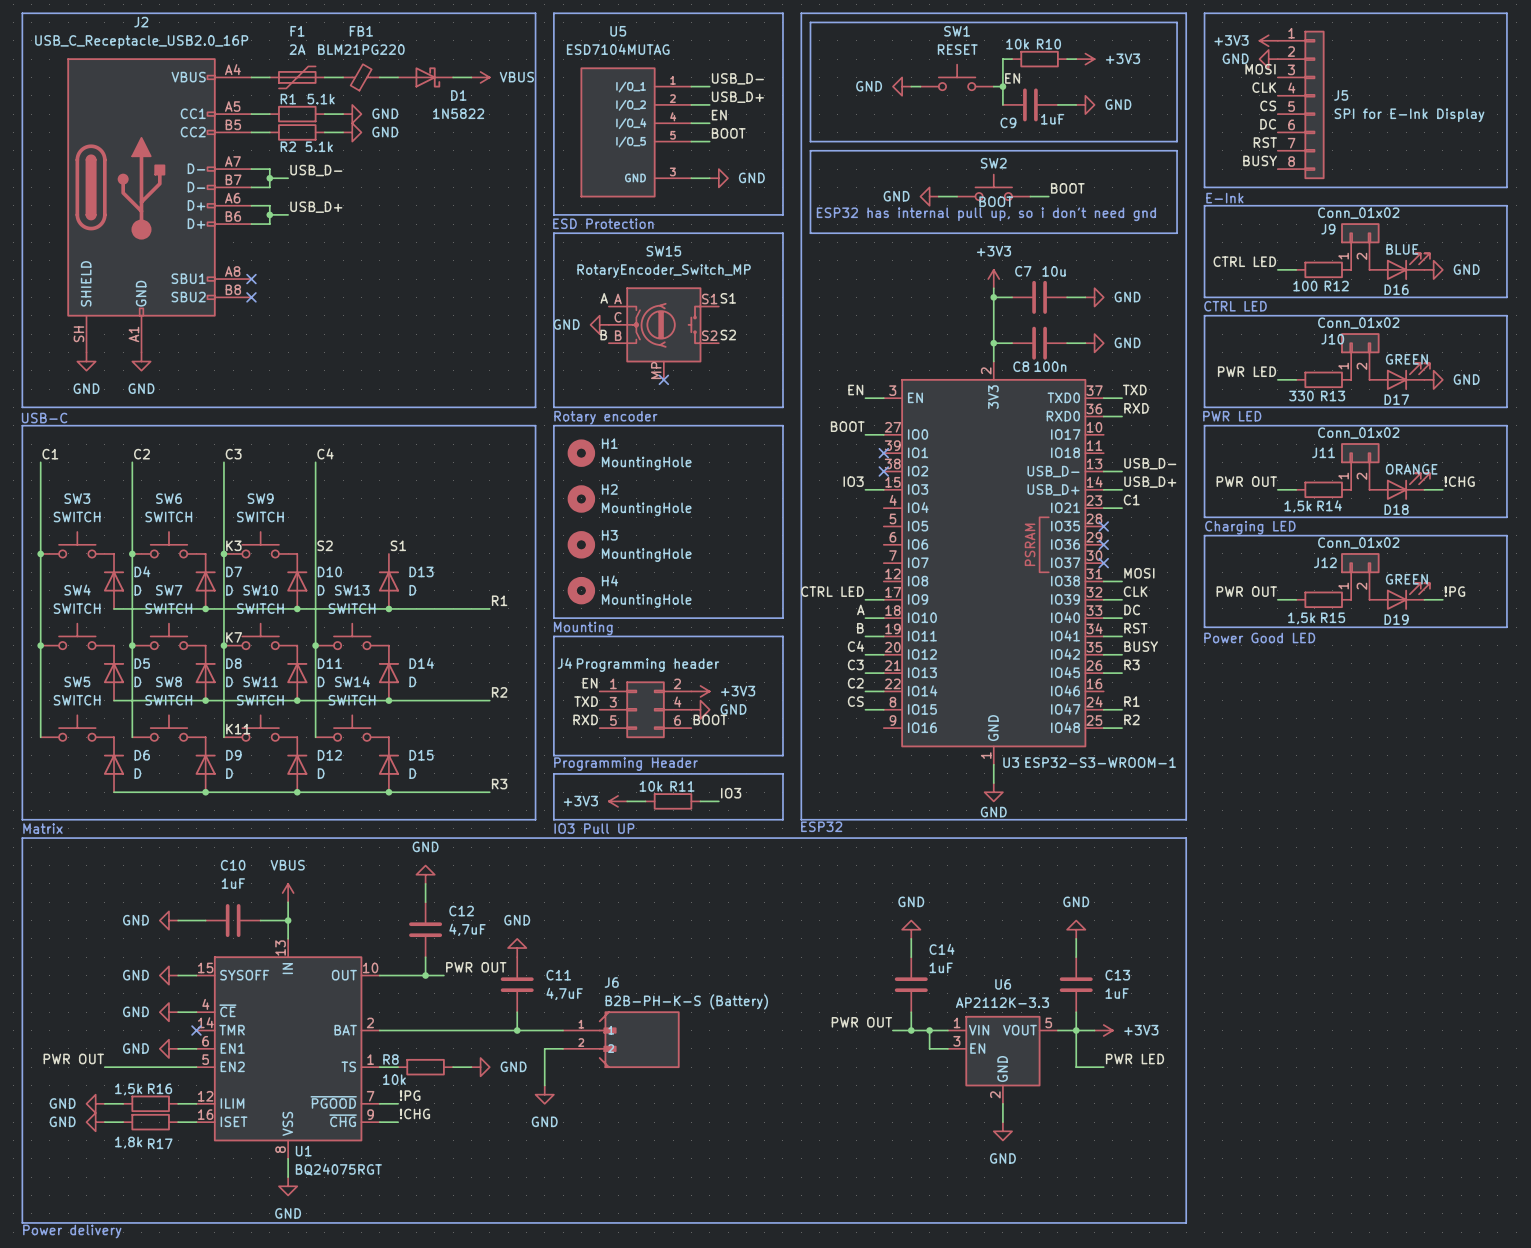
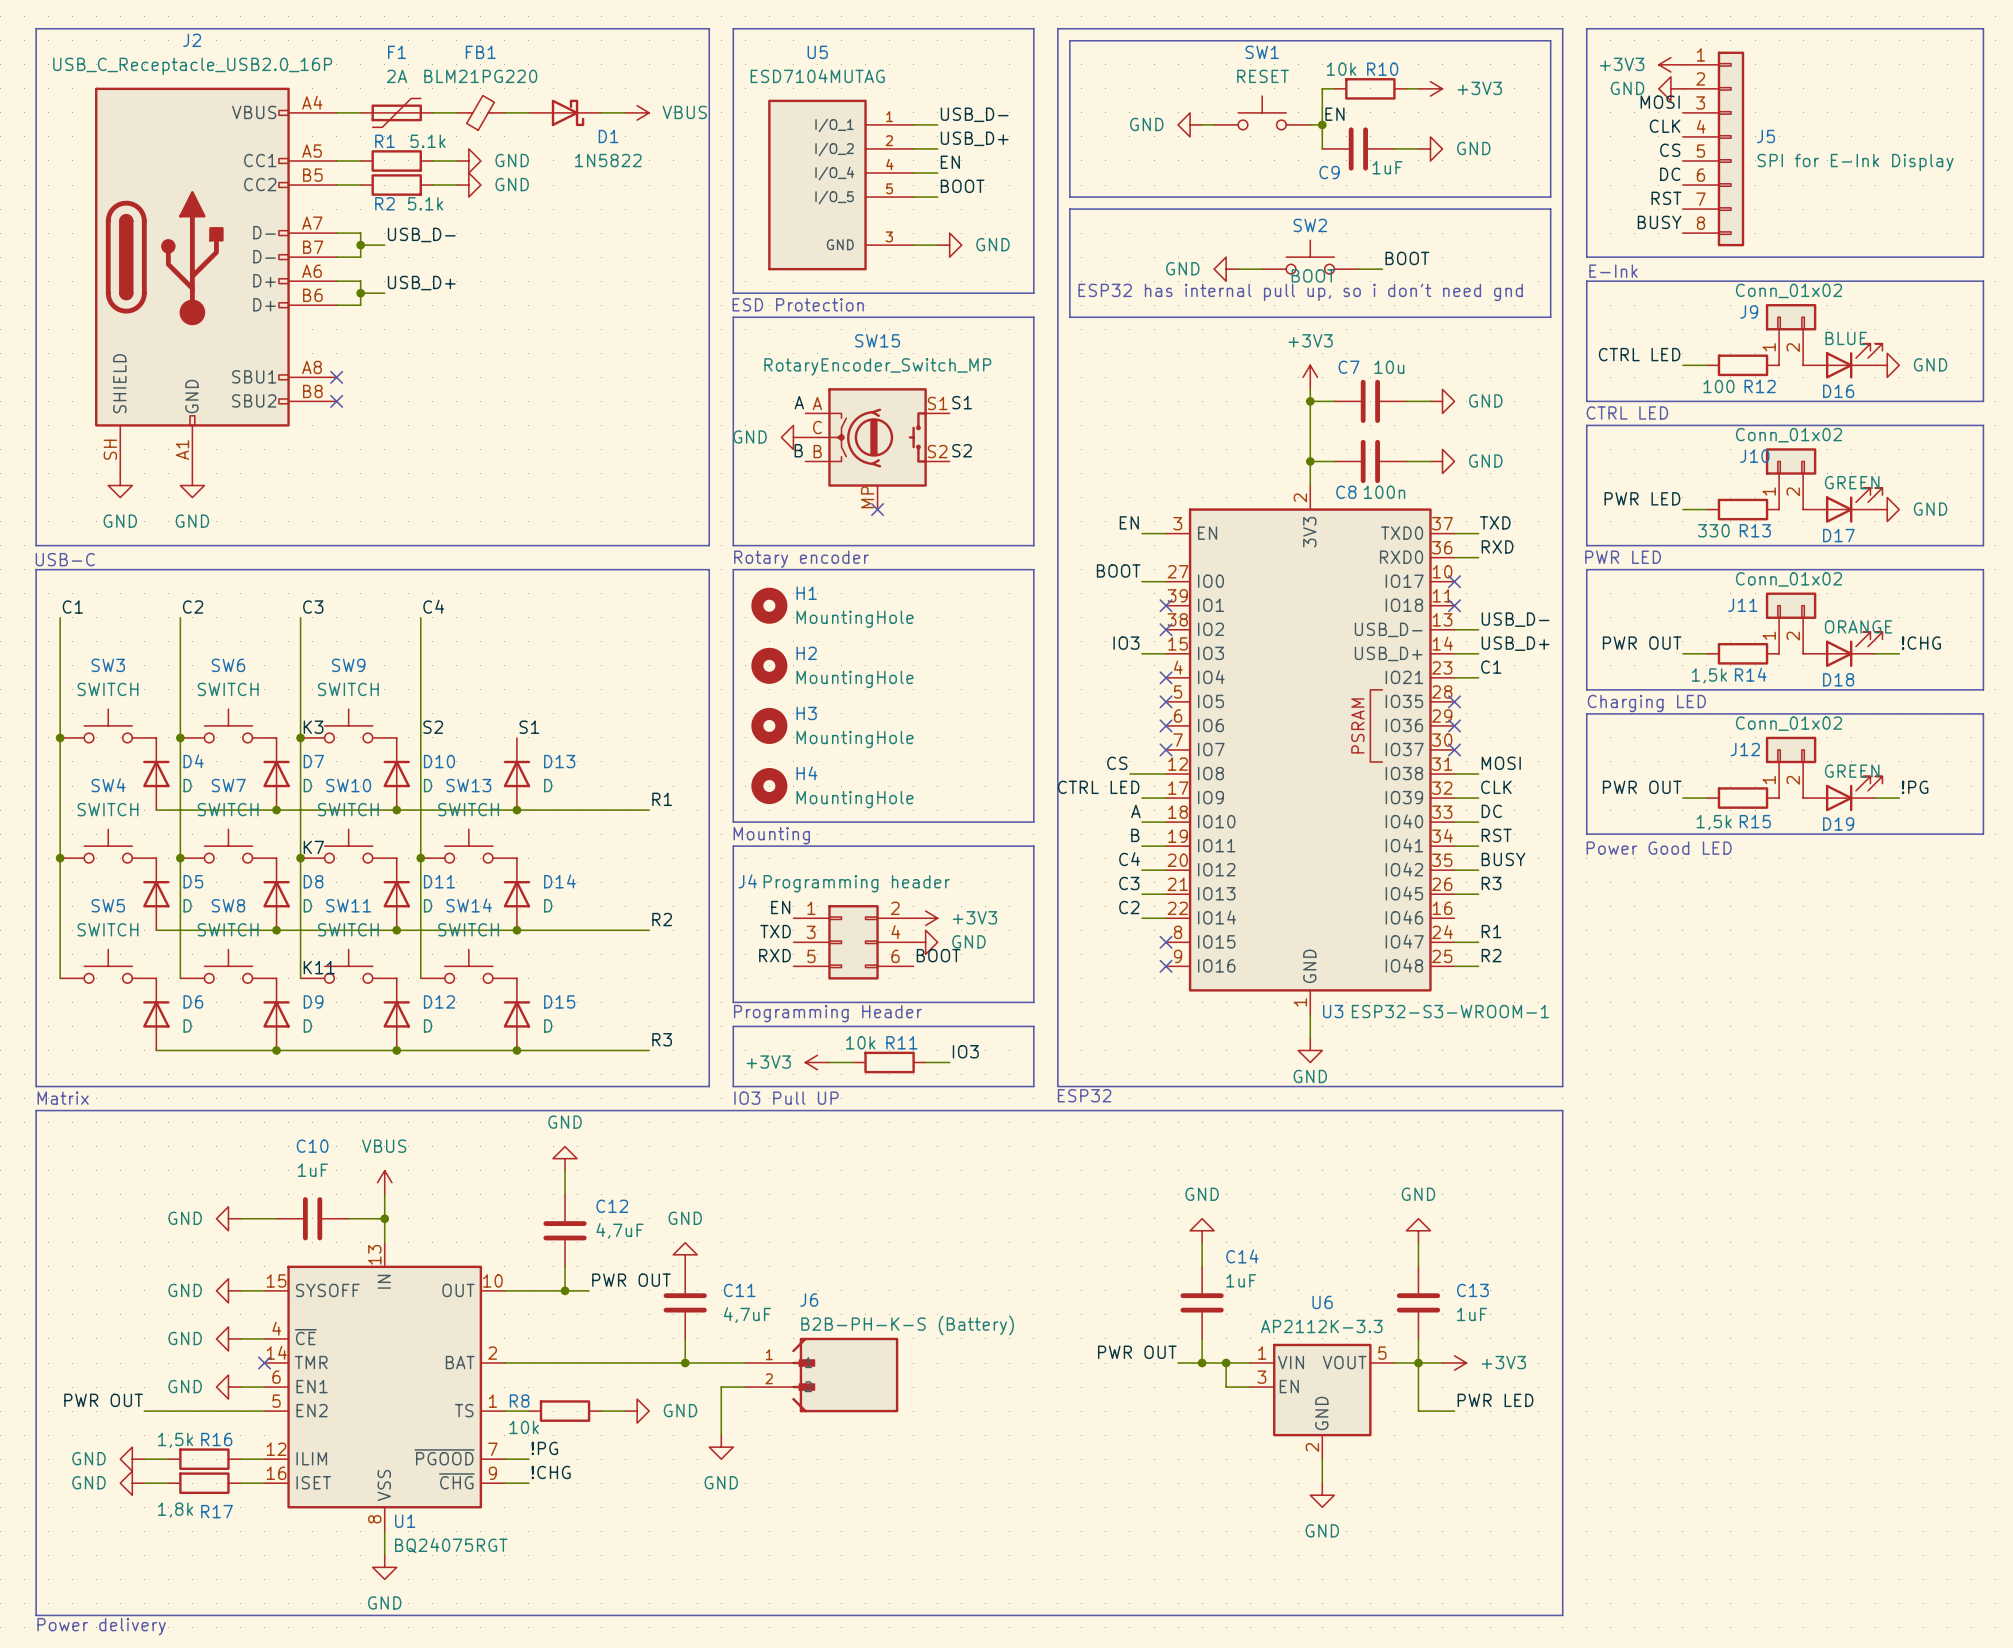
no-connect mark: none -> (1454, 581)
no-connect mark: none -> (1454, 605)
no-connect mark: none -> (1166, 677)
no-connect mark: none -> (1166, 701)
no-connect mark: none -> (1166, 725)
no-connect mark: none -> (1166, 749)
wire: none -> (1129, 774) (1166, 774)
label position: CS (855, 701) -> CS (1117, 763)
wire: (865, 709) (883, 709) -> none
no-connect mark: none -> (1166, 942)
no-connect mark: none -> (1166, 966)

